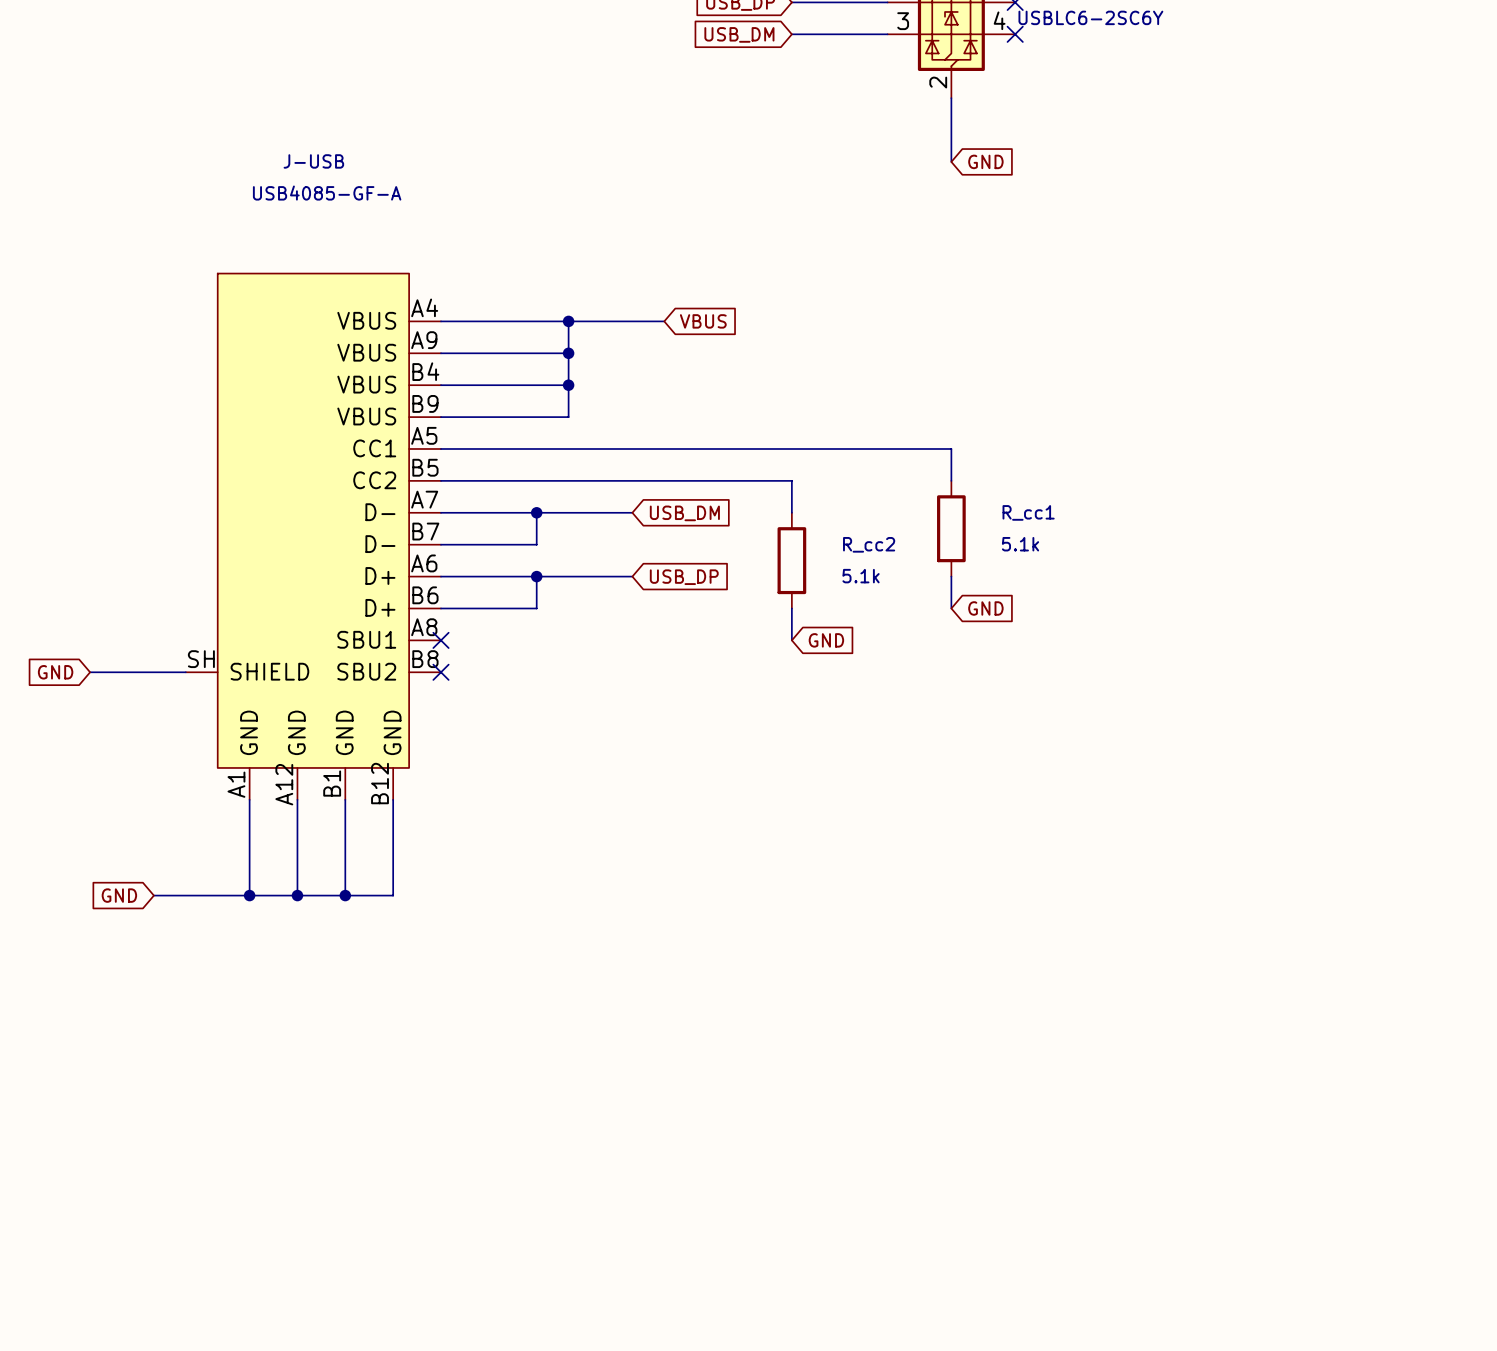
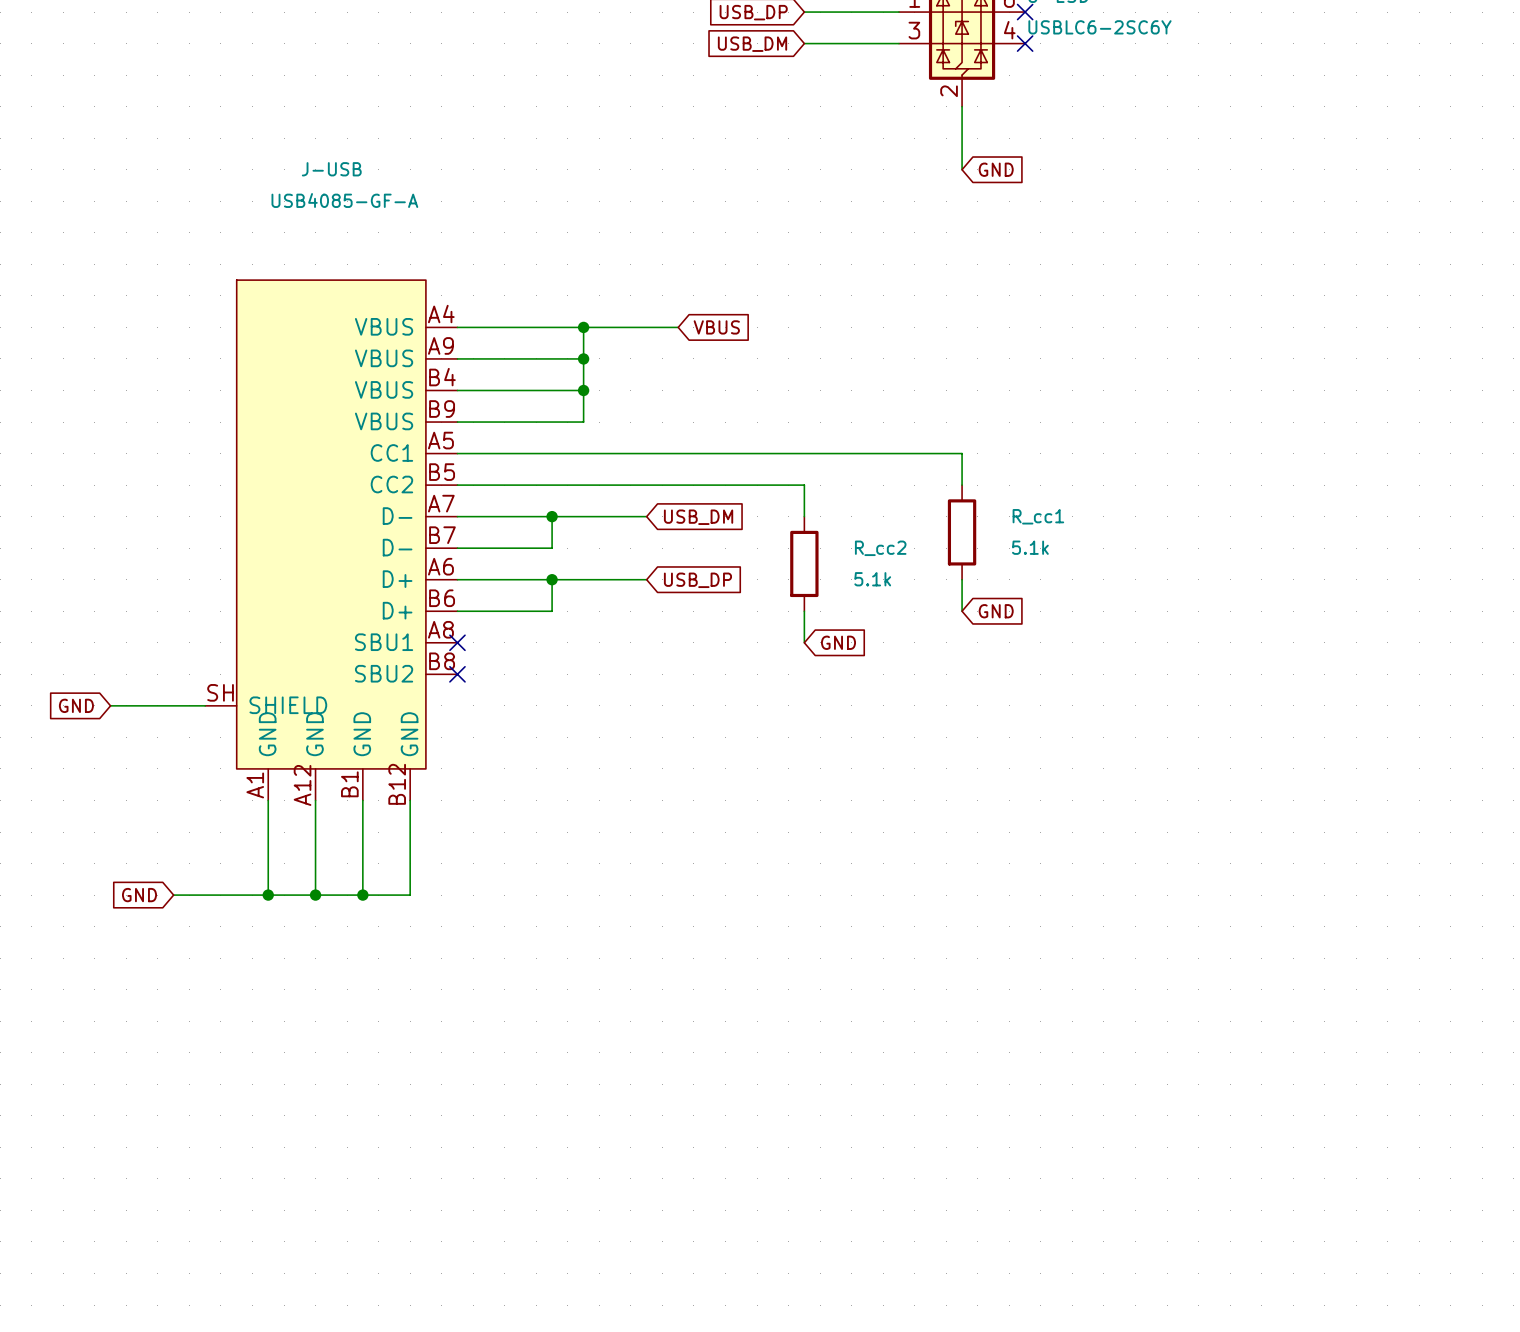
J-USB symbol: [185, 273, 442, 800] -> [205, 280, 458, 801]
global label position: GND (55, 672) -> GND (76, 705)
wire: (90, 672) (185, 672) -> (110, 705) (205, 705)

